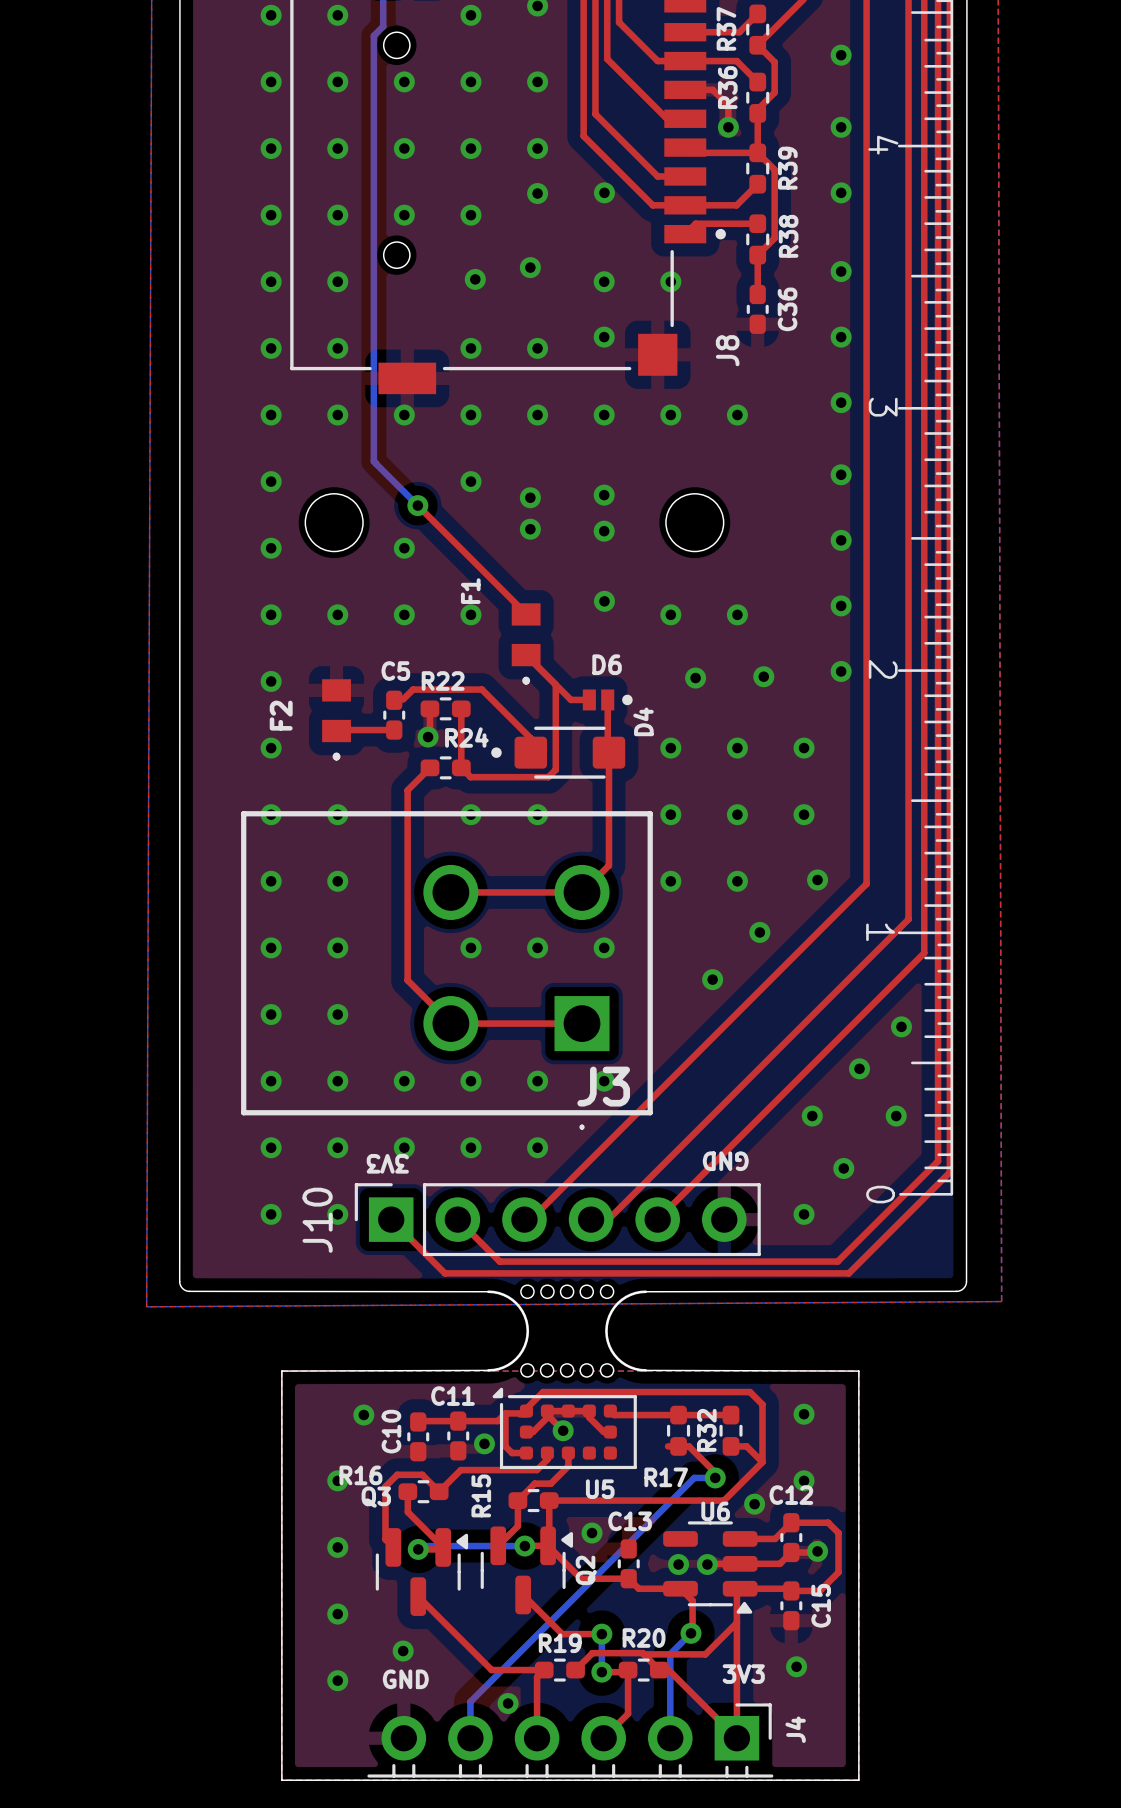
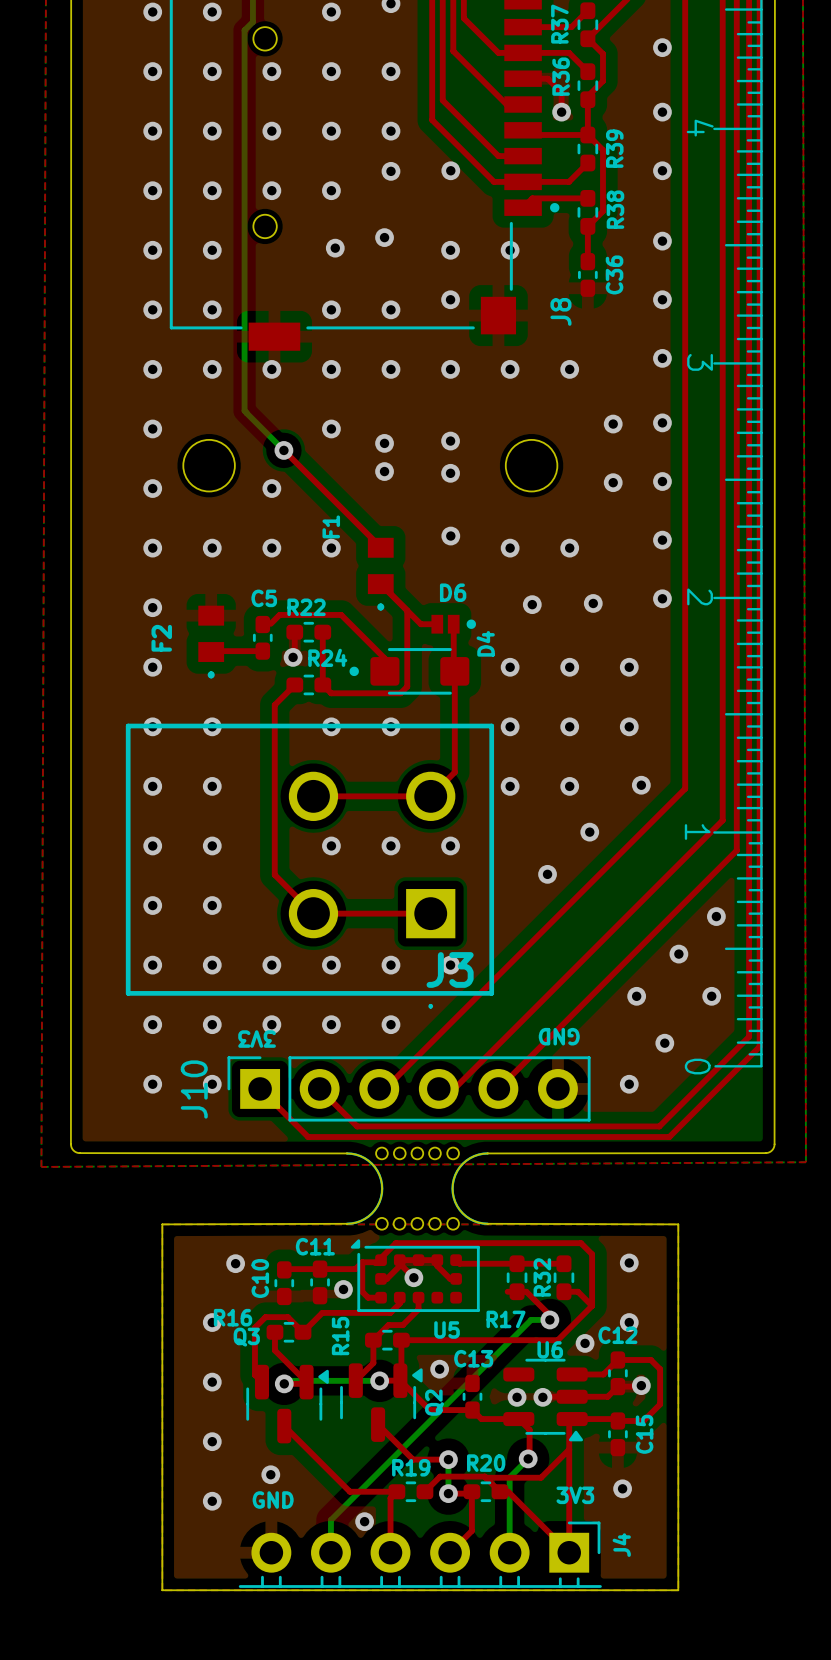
via: none -> (613, 424)
via: none -> (613, 482)

